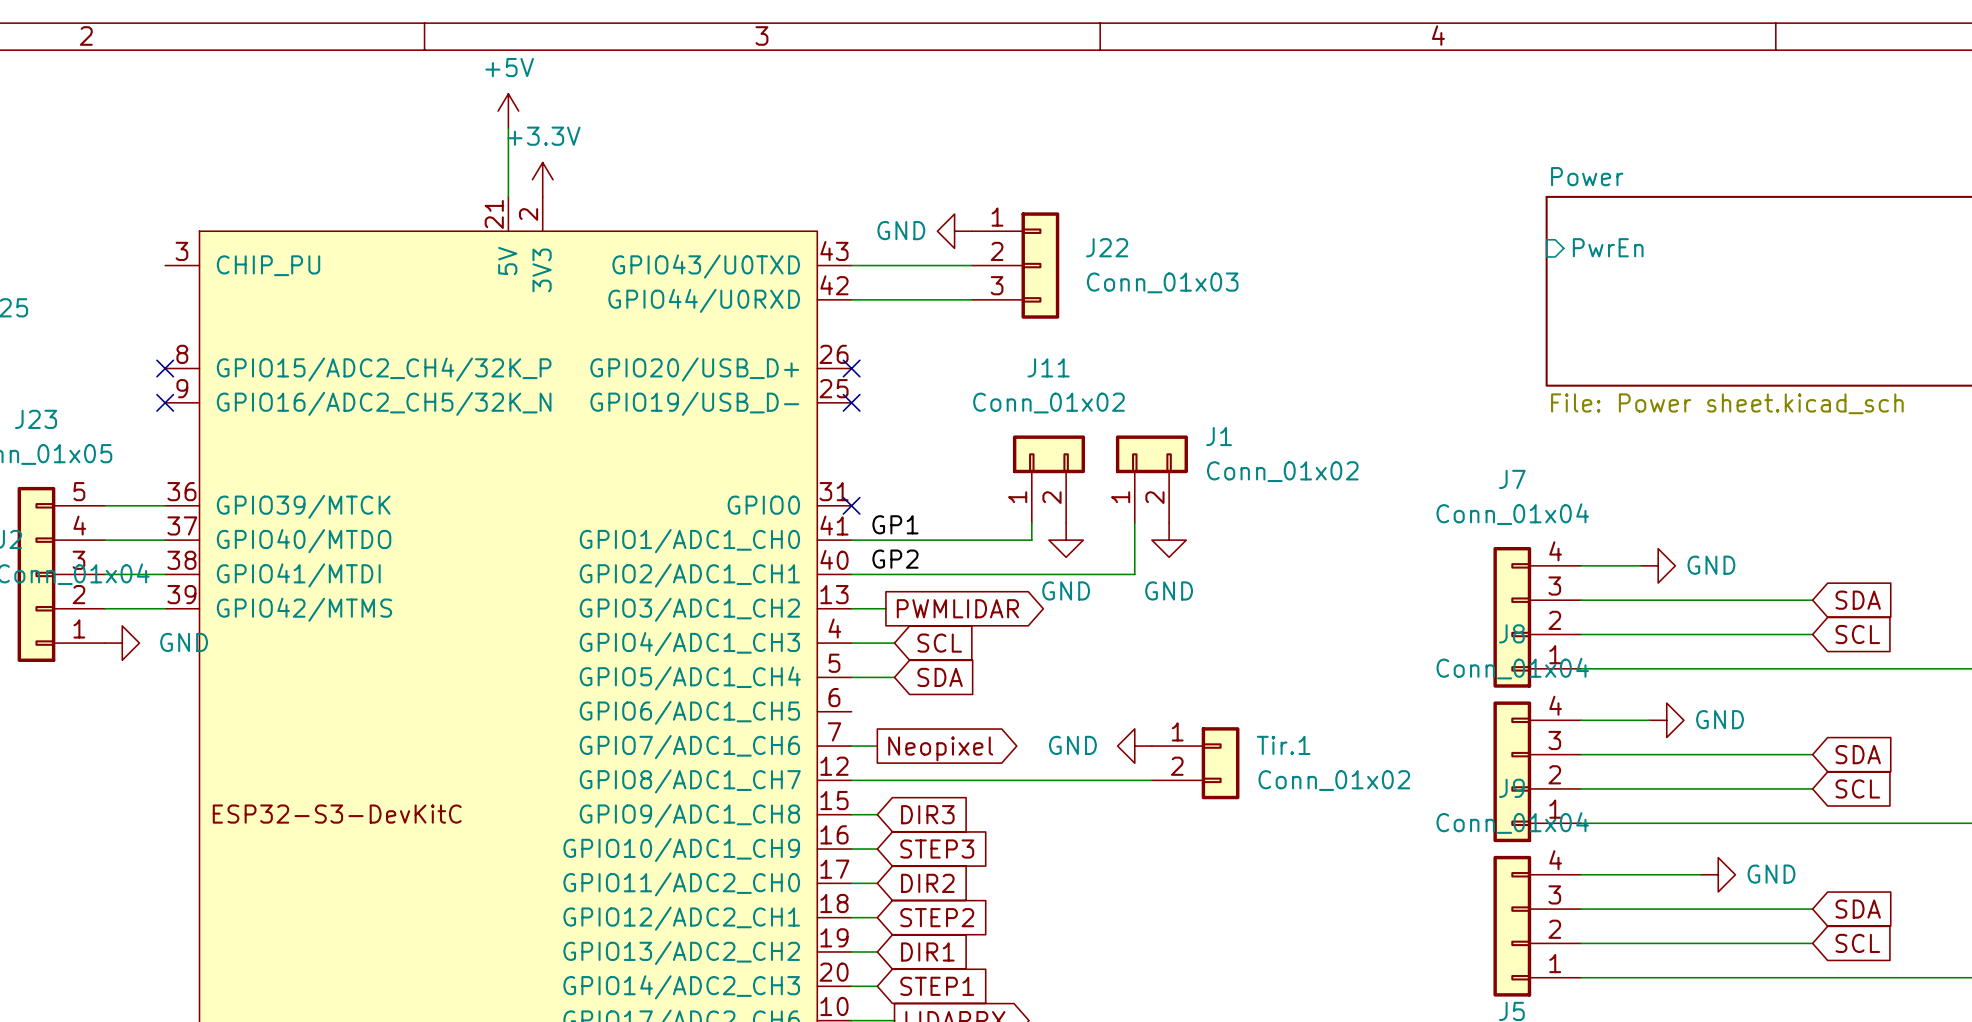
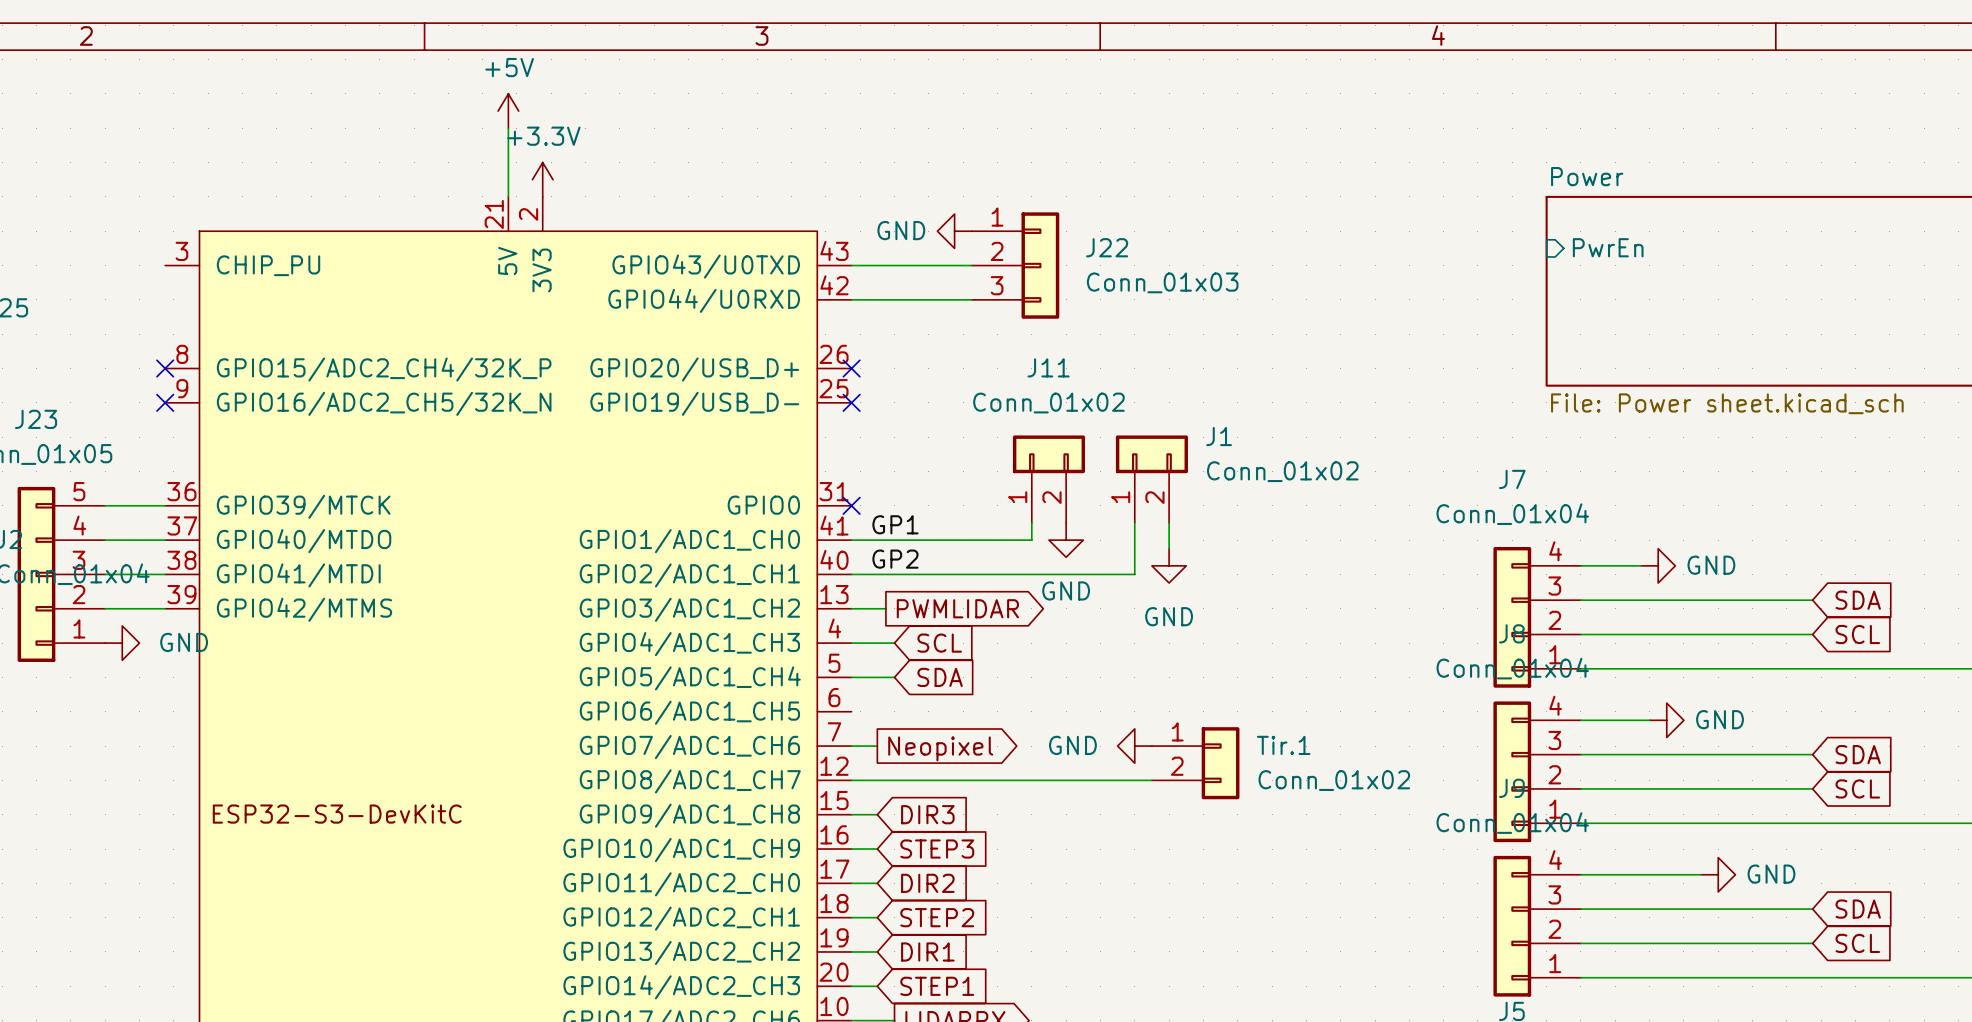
power symbol position: GND (1169, 540) -> GND (1169, 565)

